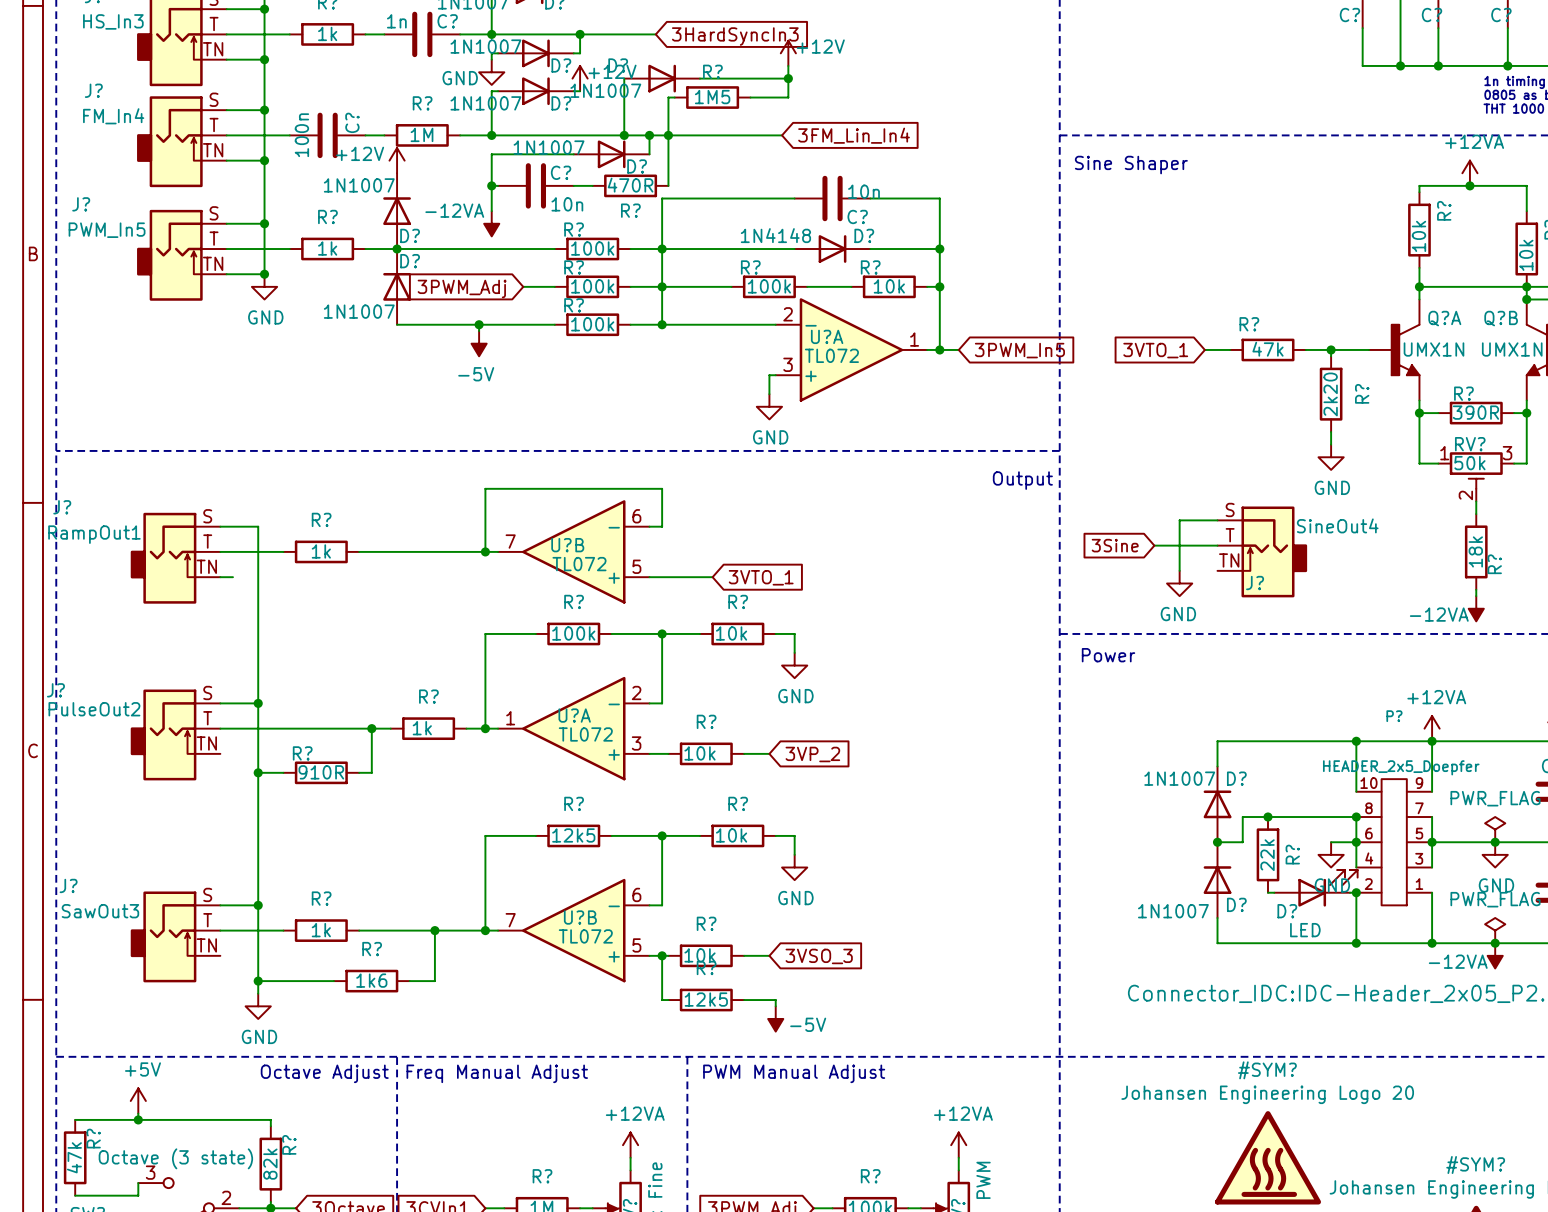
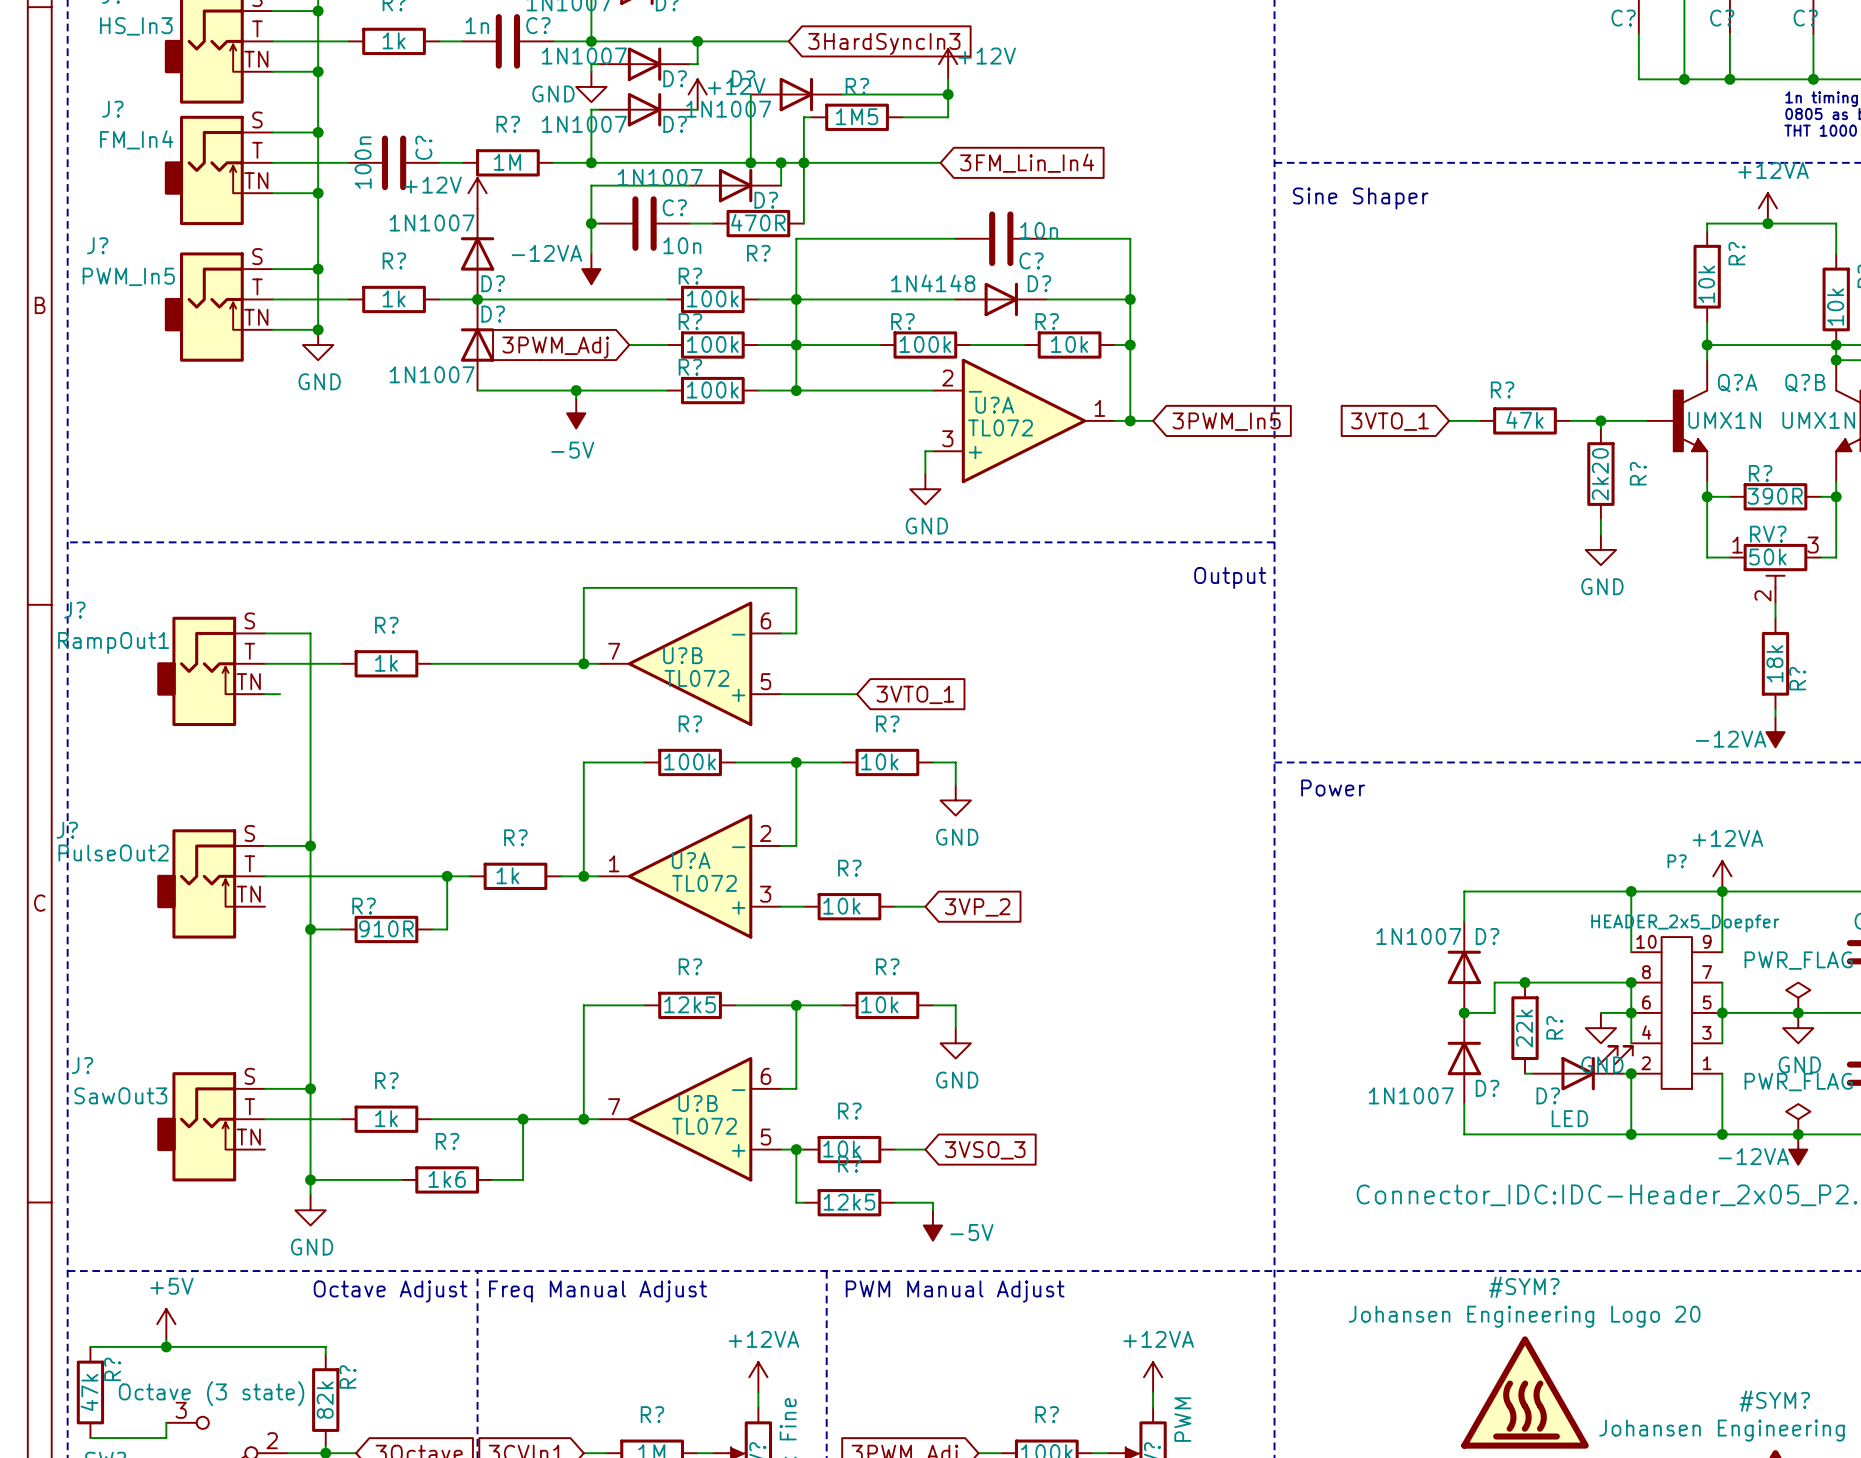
wire: (1217, 520) (1179, 520) (1179, 570) -> none
global label: 3Sine (1115, 545) -> none
wire: (1154, 545) (1217, 545) -> none
J?: SineOut4 (1262, 551) -> none
power symbol: GND (1179, 583) -> none

